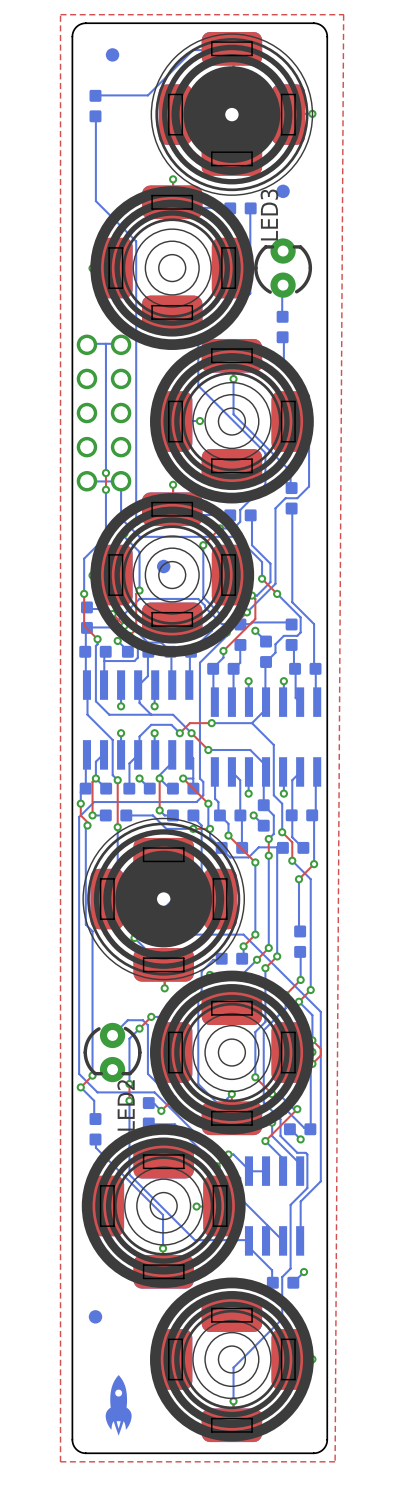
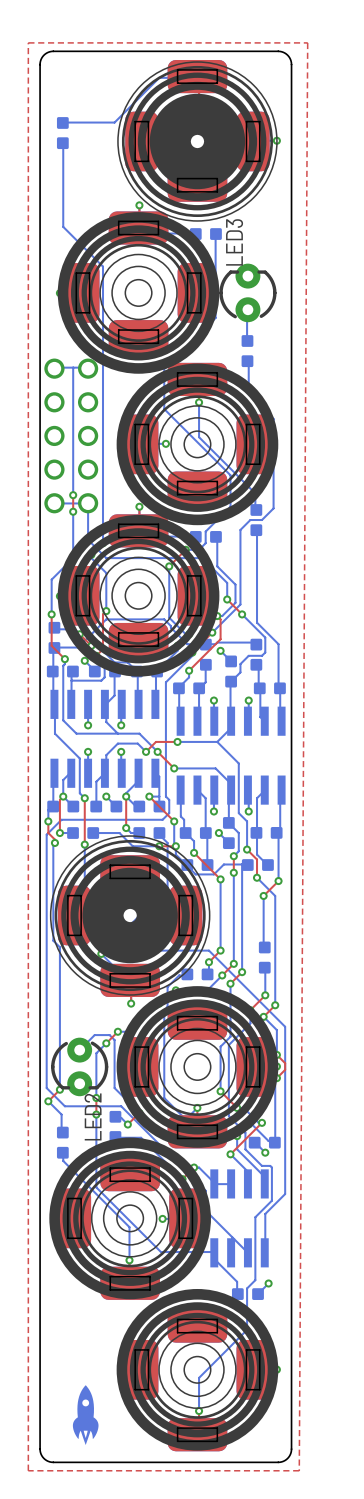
part: (112, 54) -> none
part: (283, 191) -> none
part: (163, 566) -> none
part: (95, 1316) -> none

